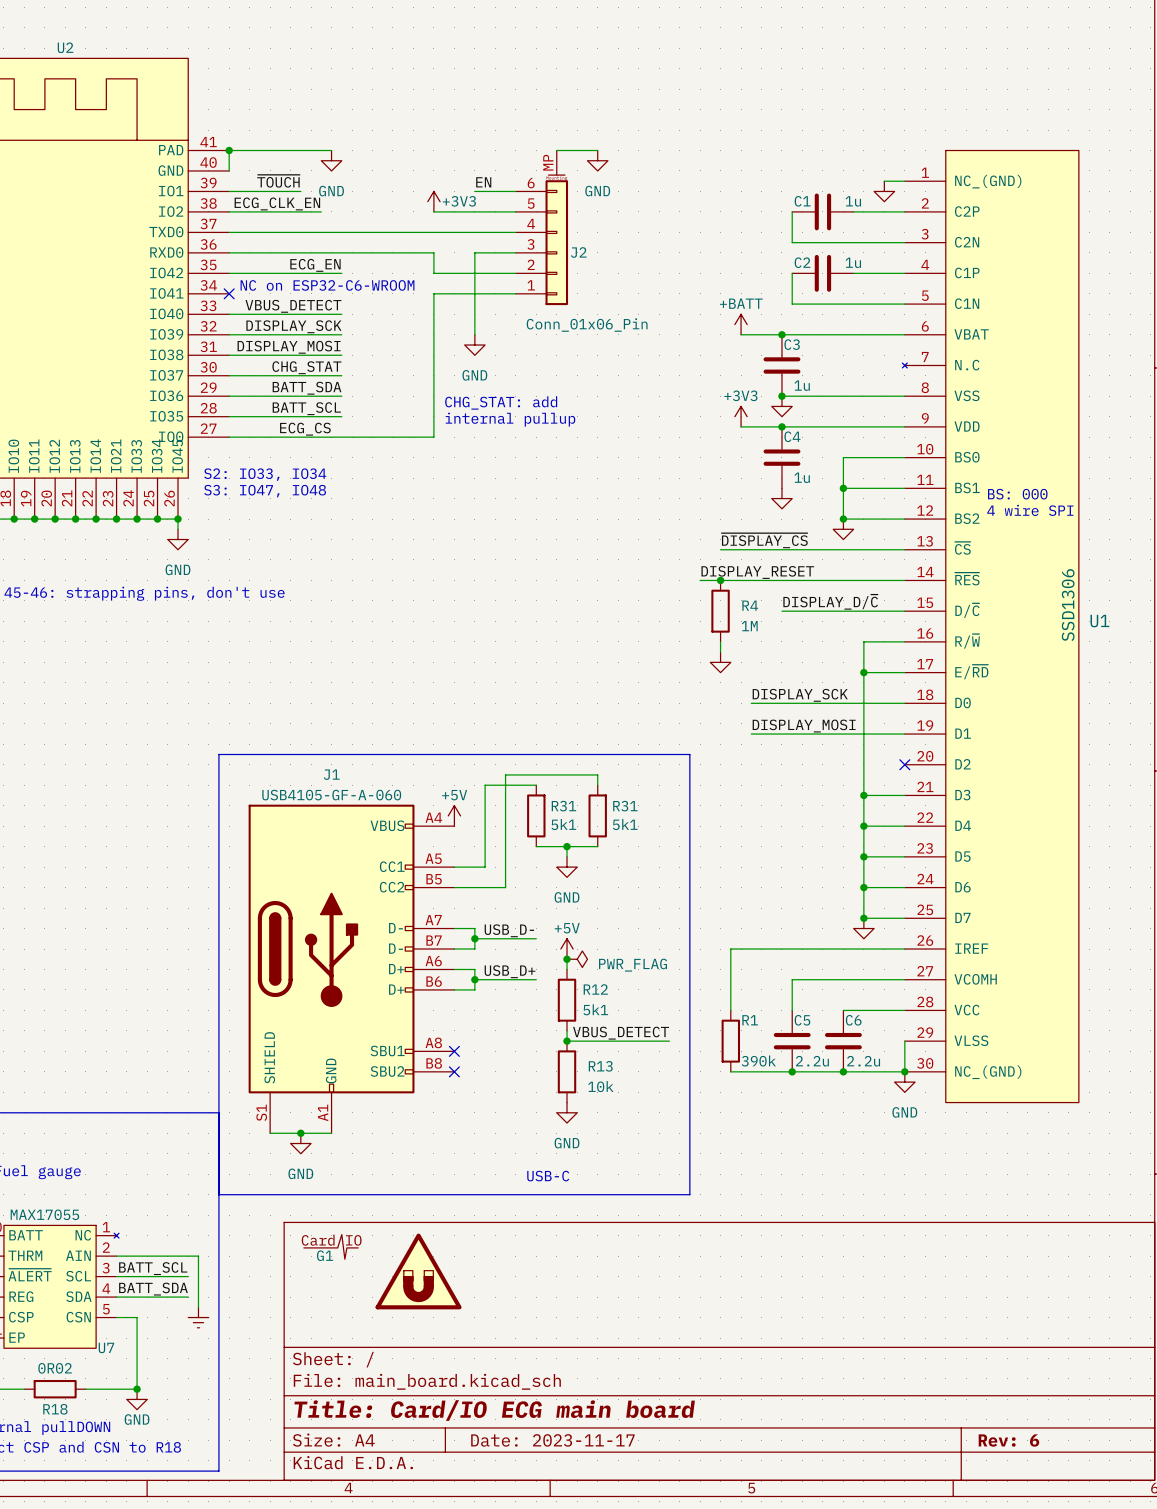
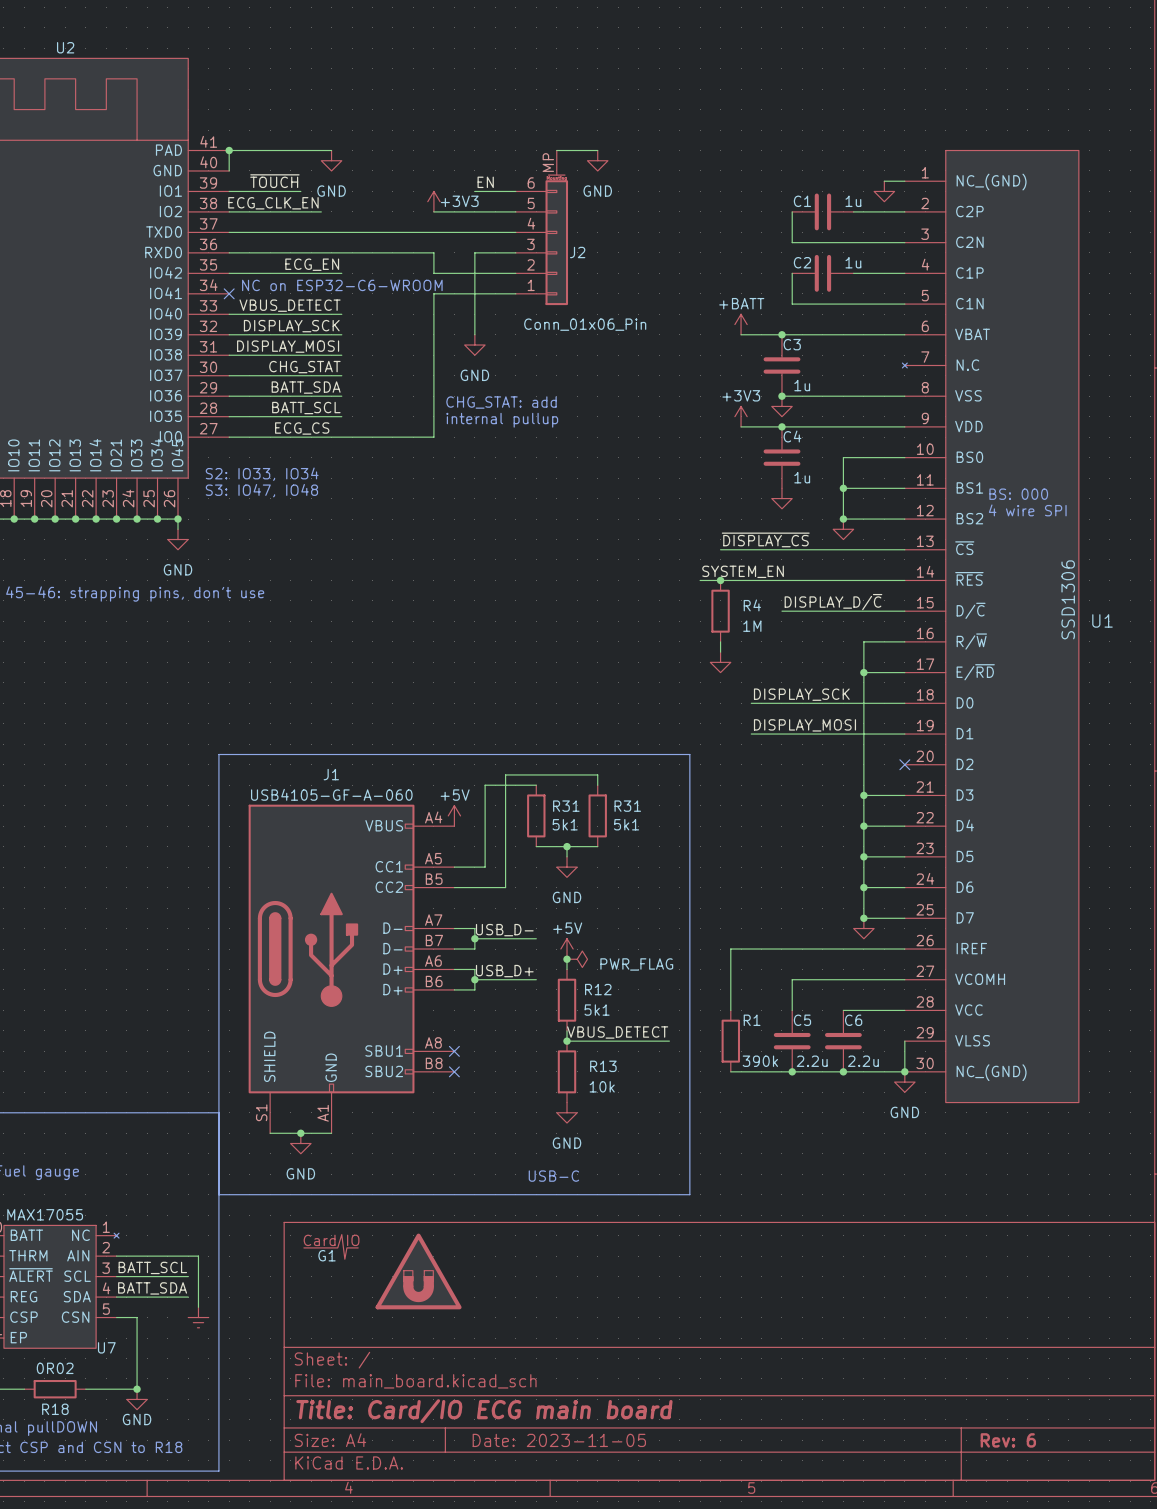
label: DISPLAY_RESET (757, 572) -> SYSTEM_EN (743, 571)
title block: Date: 2023-11-17 (552, 1440) -> Date: 2023-11-05 (559, 1440)

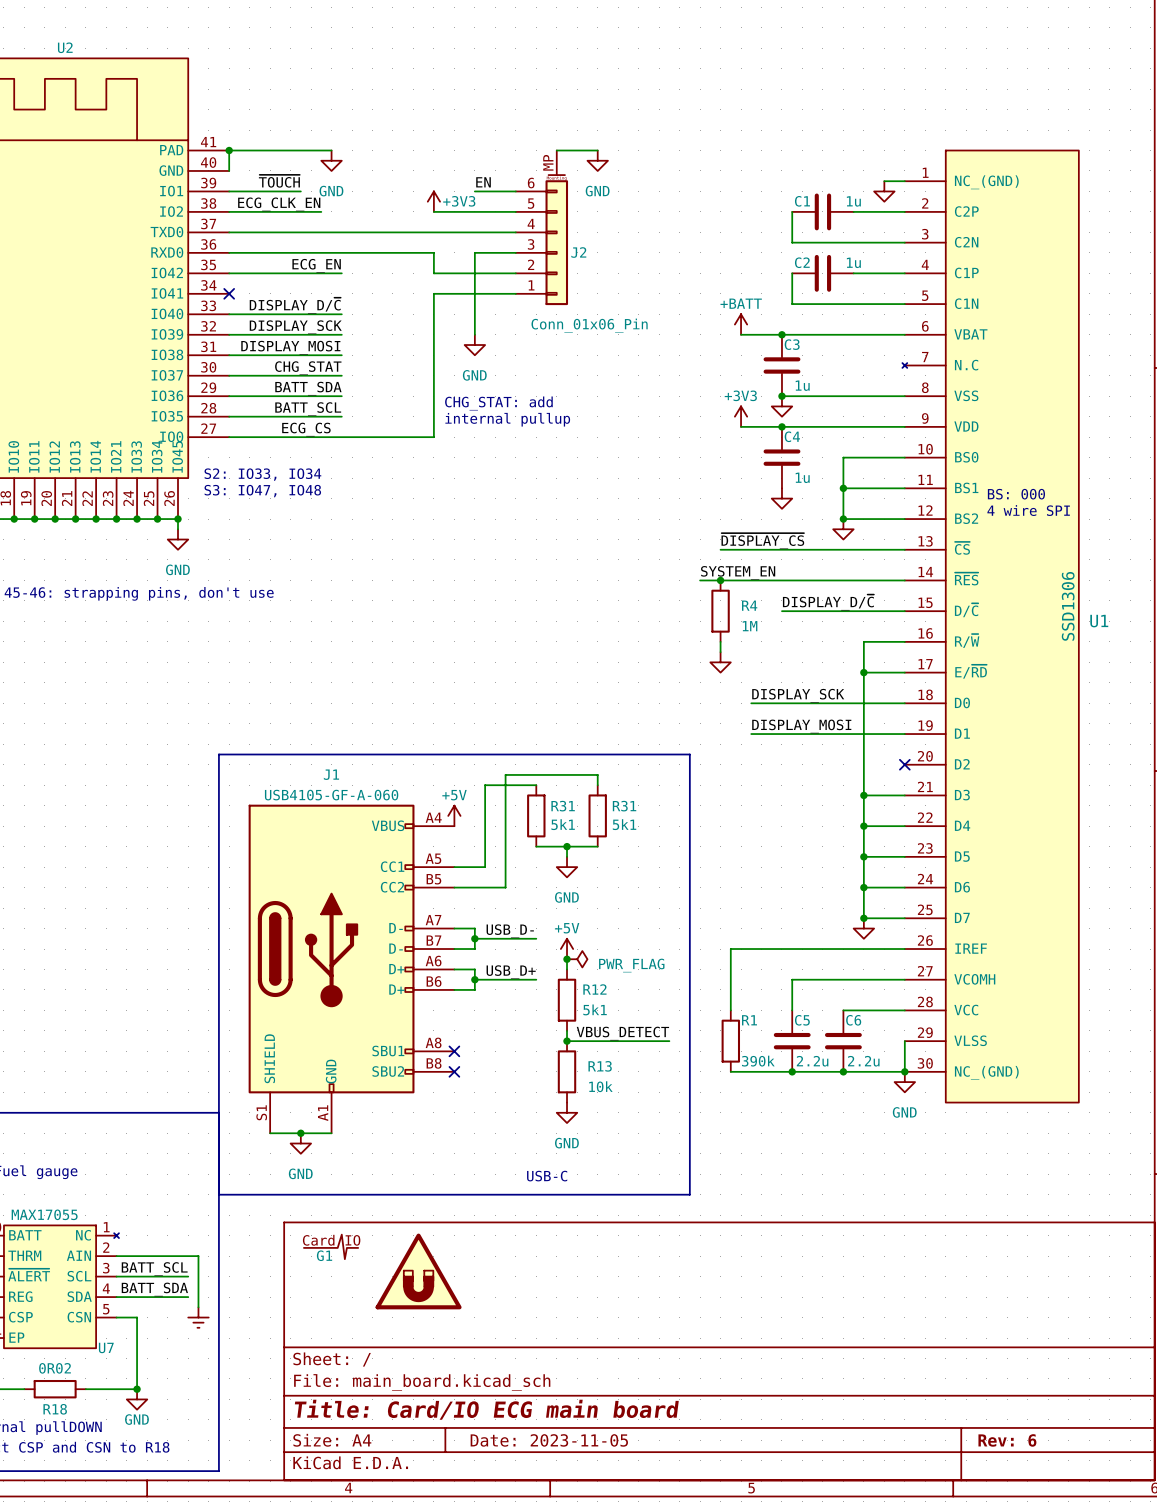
text: NC on ESP32-C6-WROOM (342, 285) -> none
label: VBUS_DETECT (290, 305) -> DISPLAY_D/~{C} (295, 305)

